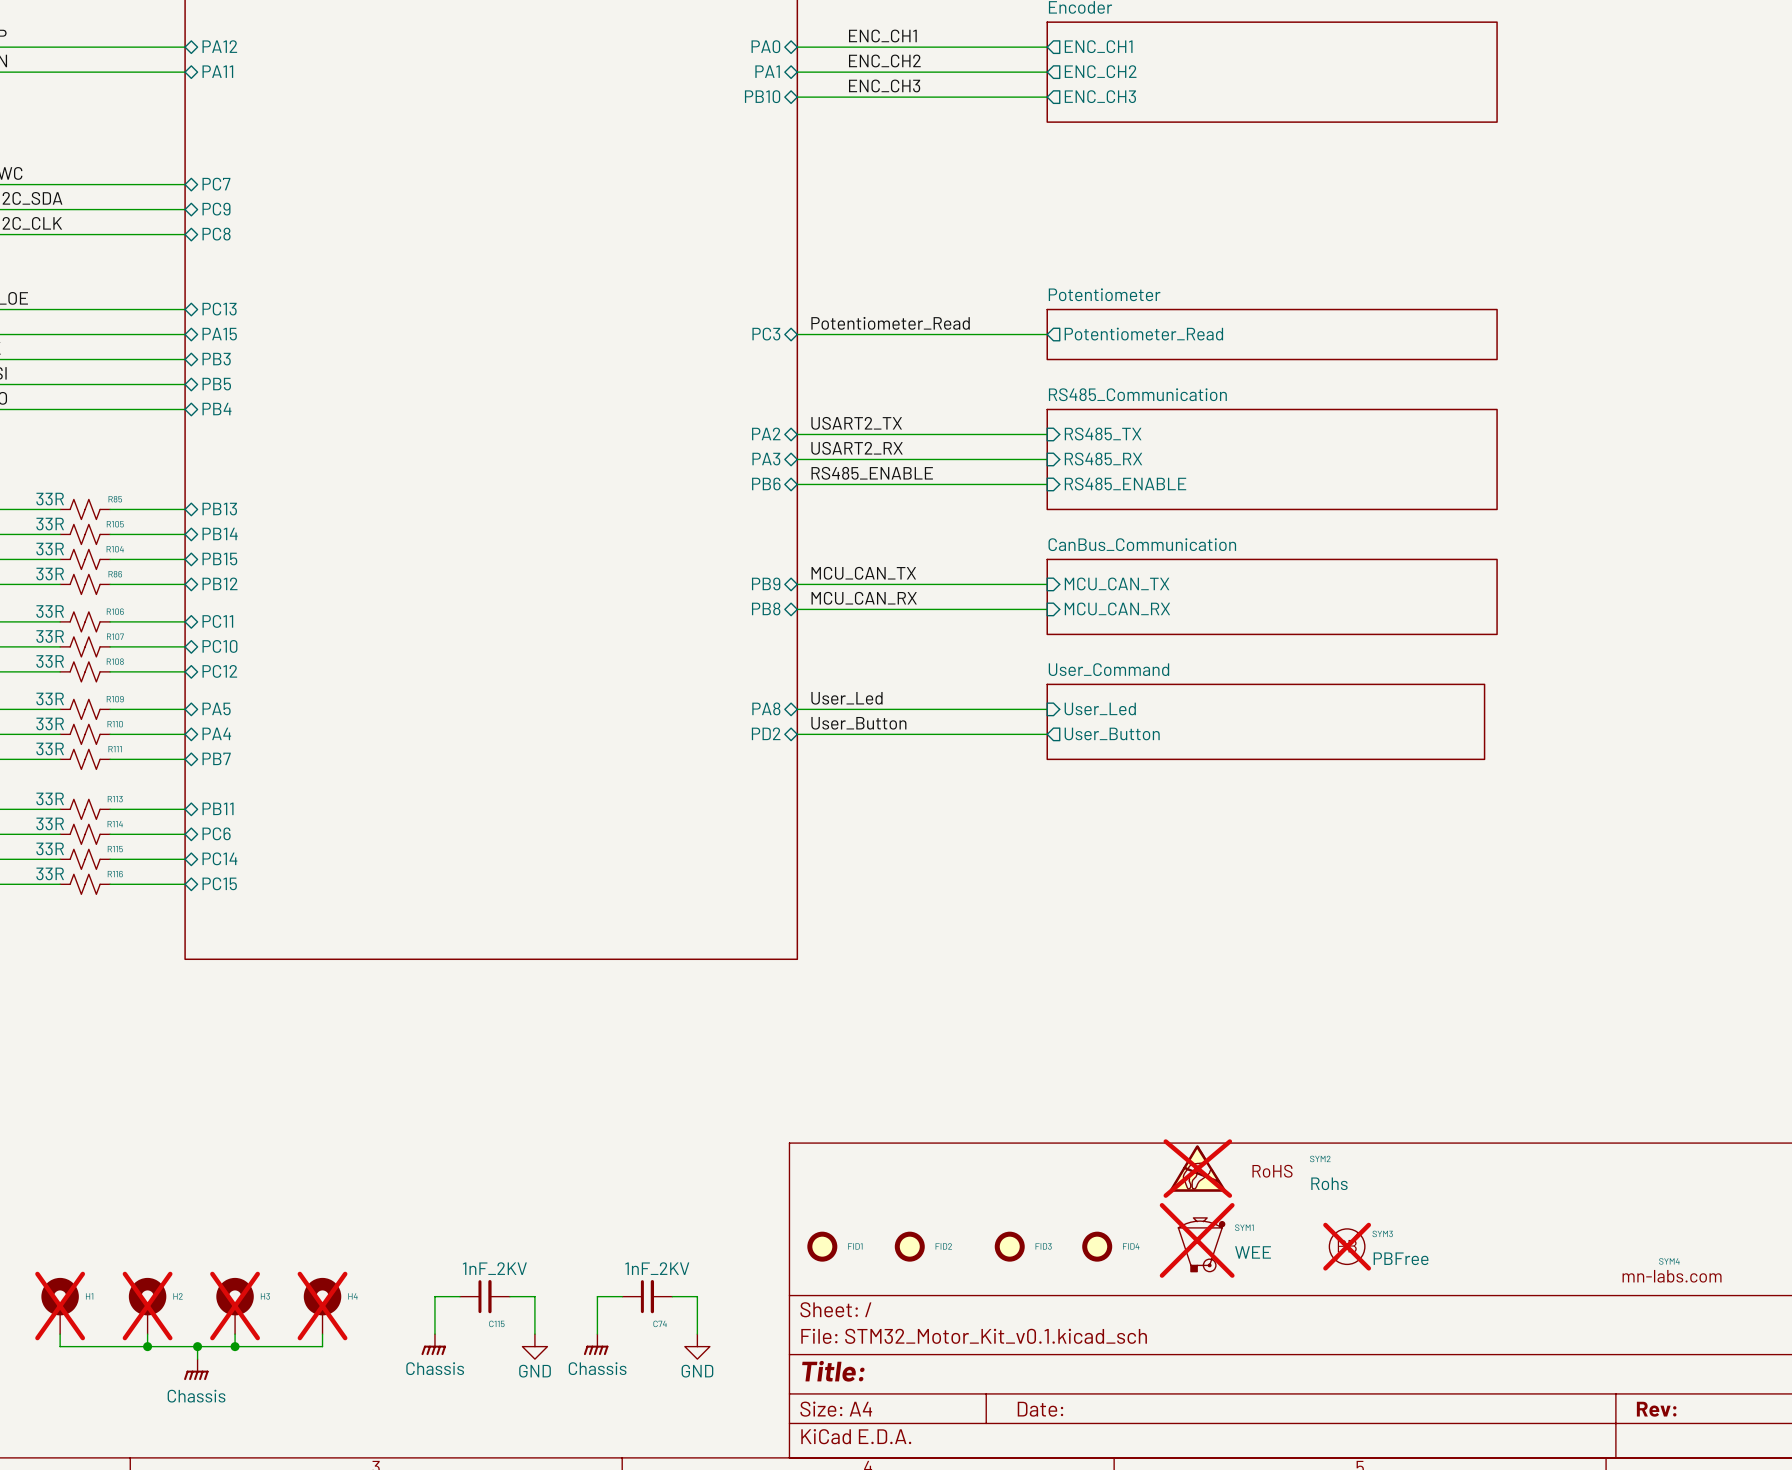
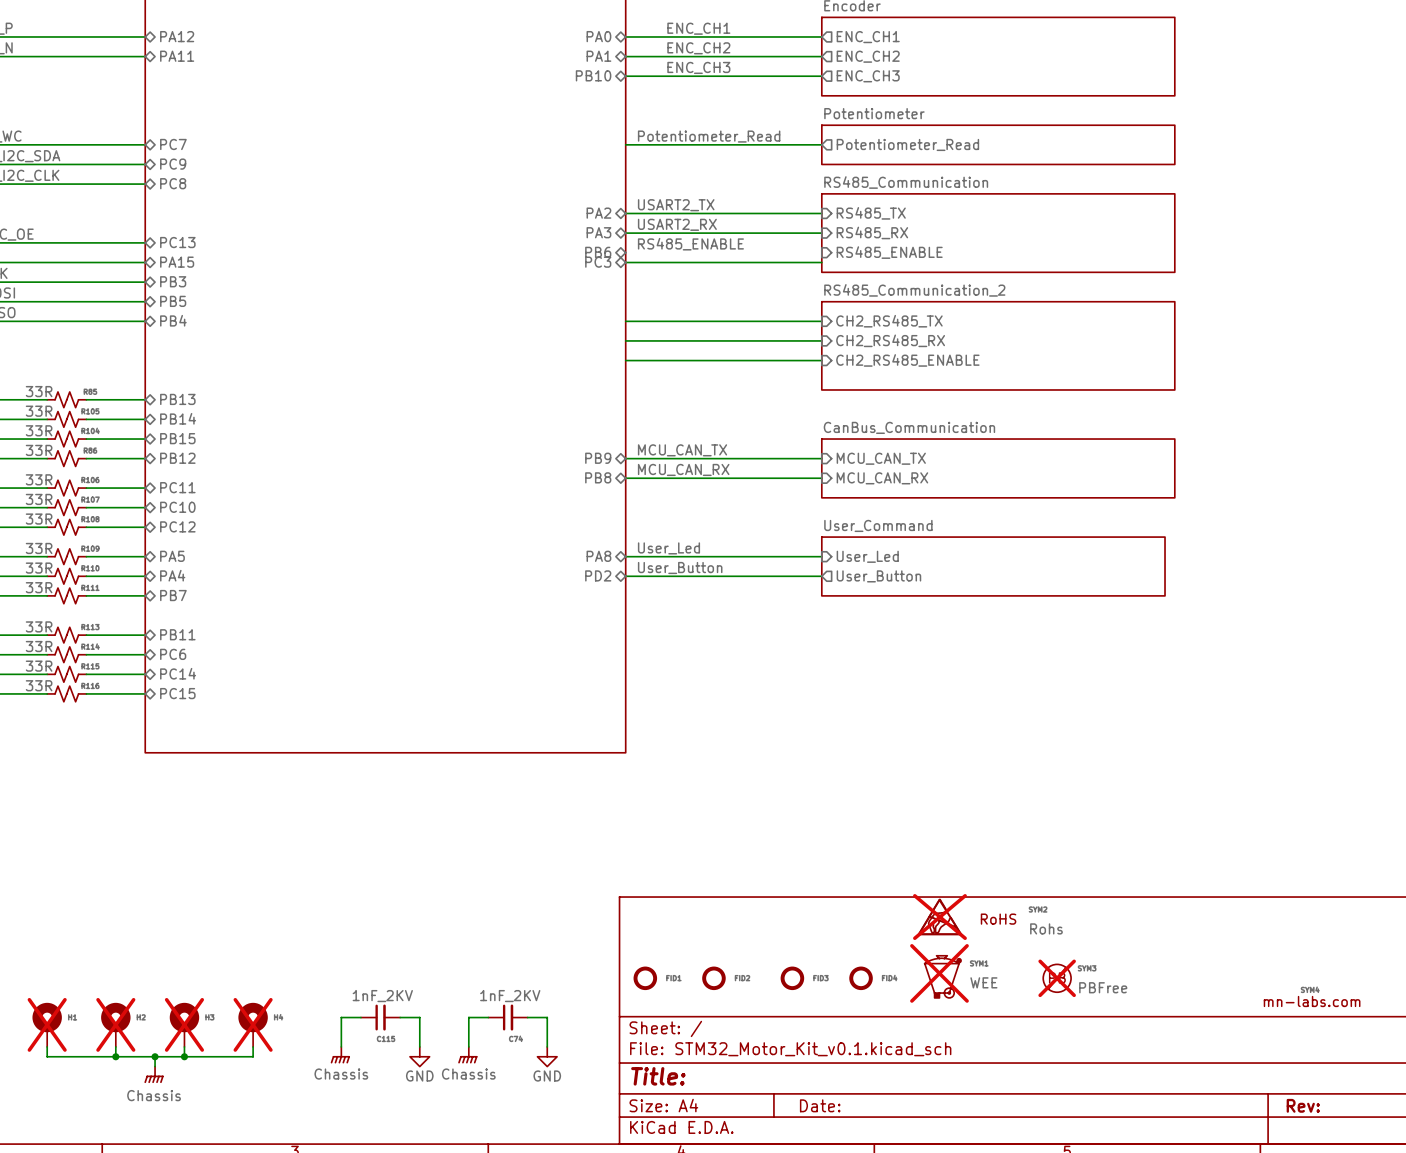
wire: none -> (625, 144) (821, 144)
sheet pin: none -> RS485_TX (871, 213)
wire: none -> (625, 213) (821, 213)
sheet pin: none -> RS485_RX (872, 232)
wire: none -> (625, 233) (821, 233)
label position: Potentiometer_Read (890, 323) -> Potentiometer_Read (709, 136)
sheet pin position: Potentiometer_Read (1143, 334) -> Potentiometer_Read (907, 144)
sheet Potentiometer position: (1272, 334) -> (998, 144)
sheet pin: none -> CH2_RS485_TX (889, 321)
label position: USART2_TX (856, 423) -> USART2_TX (676, 205)
sheet pin position: PA2 (766, 433) -> PA2 (598, 213)
sheet pin: RS485_TX (1103, 434) -> CH2_RS485_RX (890, 340)
sheet RS485_Communication_2: none -> (998, 345)
label position: USART2_RX (857, 448) -> USART2_RX (677, 224)
sheet pin: RS485_RX (1103, 458) -> CH2_RS485_ENABLE (907, 360)
sheet pin position: PA3 (766, 459) -> PA3 (598, 232)
sheet RS485_Communication position: (1272, 459) -> (998, 233)
label position: RS485_ENABLE (872, 473) -> RS485_ENABLE (690, 244)
sheet pin position: PB6 (766, 483) -> PB6 (598, 252)
sheet pin position: RS485_ENABLE (1125, 483) -> RS485_ENABLE (889, 252)
wire: (797, 484) (1047, 484) -> (625, 321) (821, 321)

